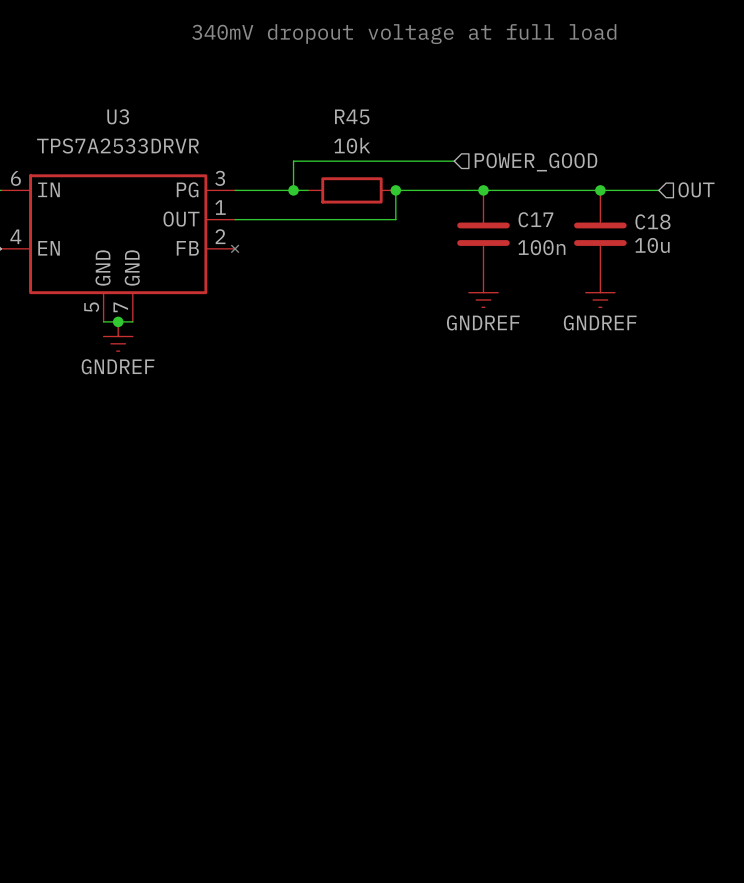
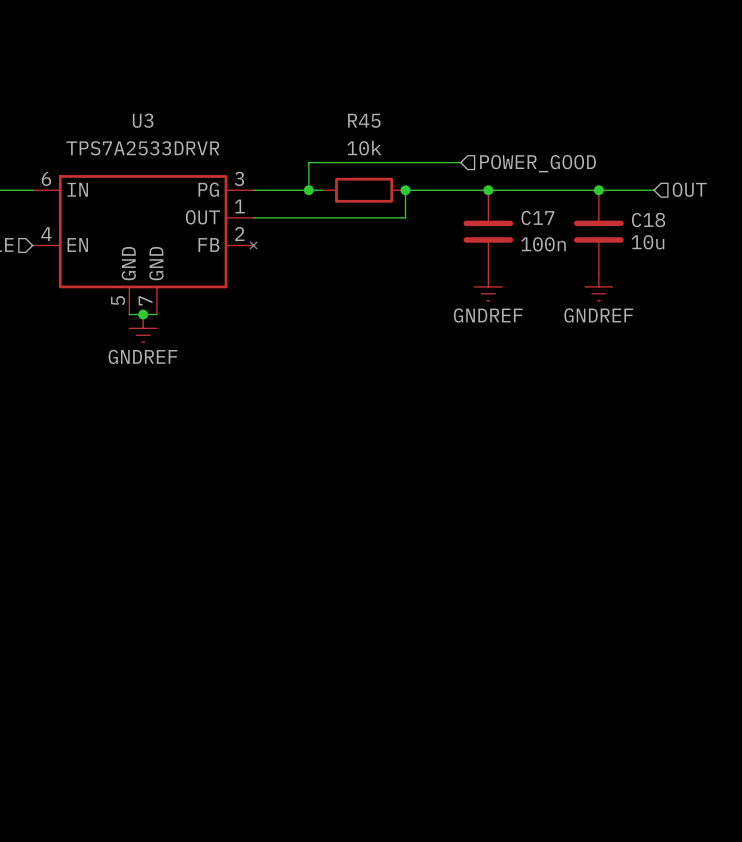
text: 340mV dropout voltage at full load (404, 34) -> none

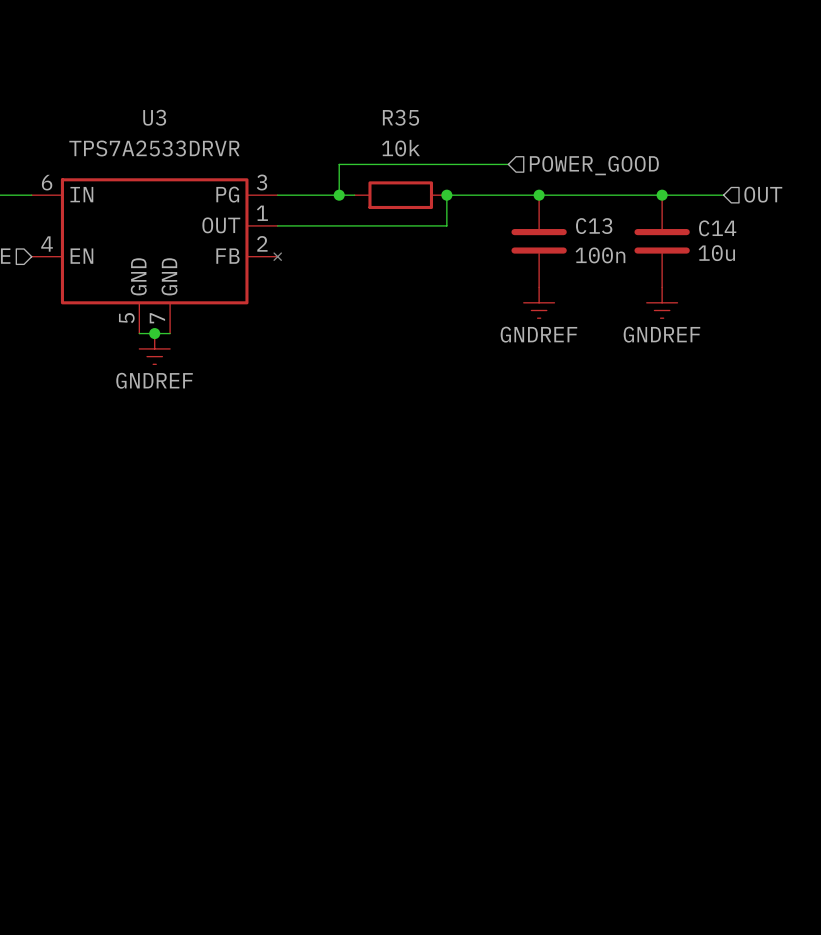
R45 name: R45 (364, 120) -> R35 (400, 117)
C17 name: C17 (537, 217) -> C13 (594, 226)
C18 name: C18 (648, 220) -> C14 (717, 228)

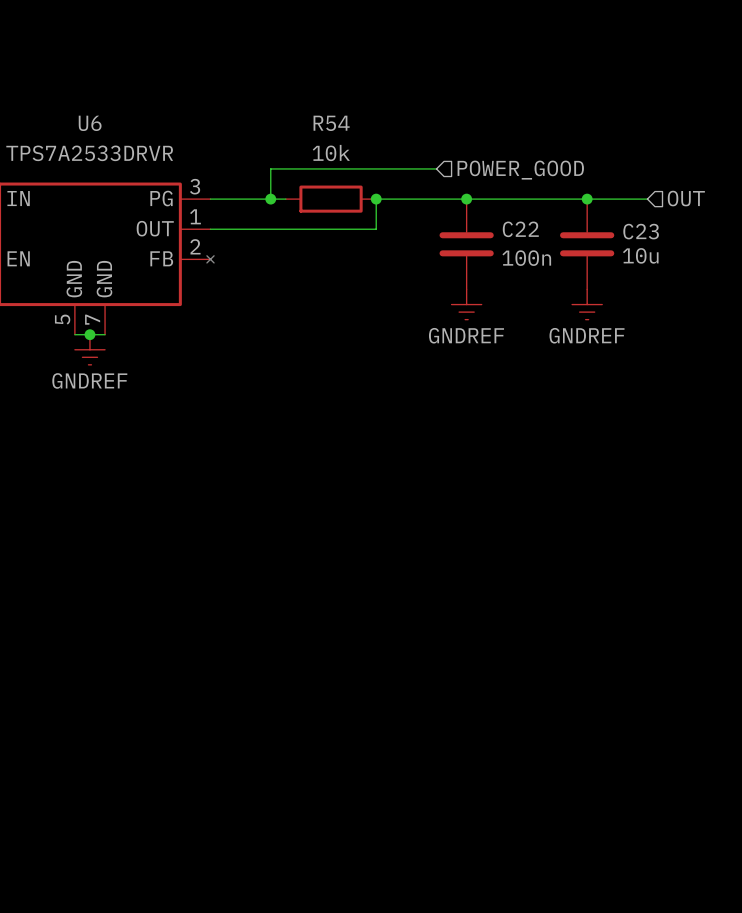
U3 name: U3 (154, 117) -> U6 (90, 123)
R35 name: R35 (400, 117) -> R54 (331, 123)
C13 name: C13 (594, 226) -> C22 (520, 229)
C14 name: C14 (717, 228) -> C23 (641, 231)

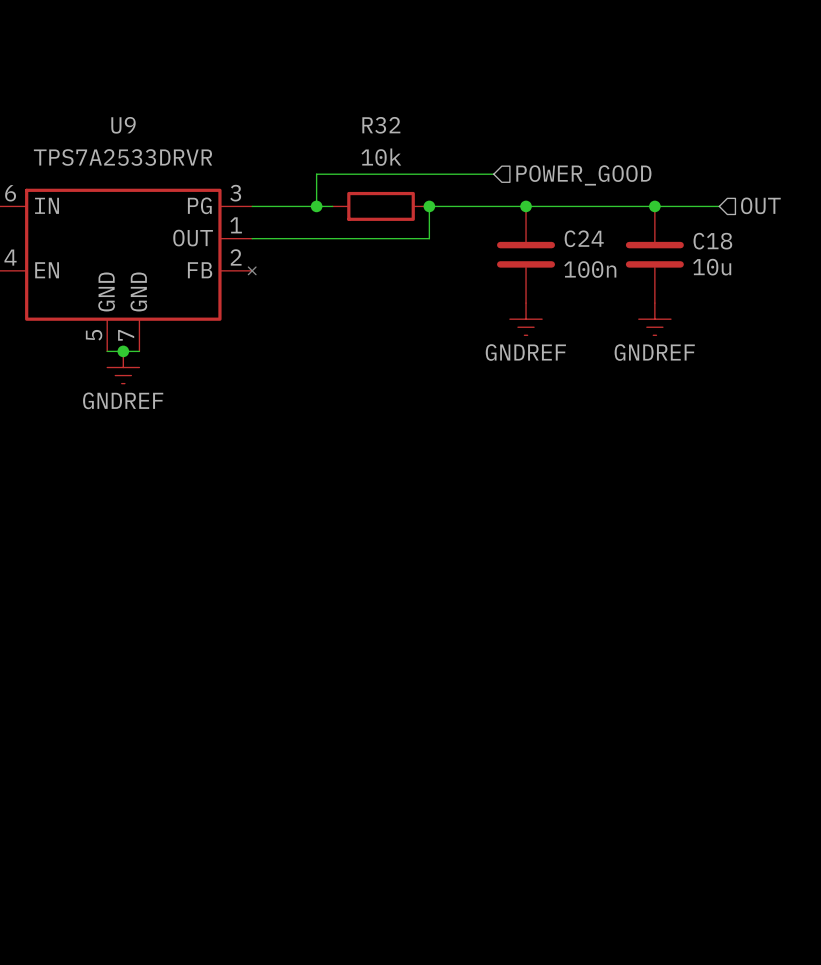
U6 name: U6 (90, 123) -> U9 (123, 125)
R54 name: R54 (331, 123) -> R32 (381, 125)
C22 name: C22 (520, 229) -> C24 (584, 238)
C23 name: C23 (641, 231) -> C18 (712, 241)

